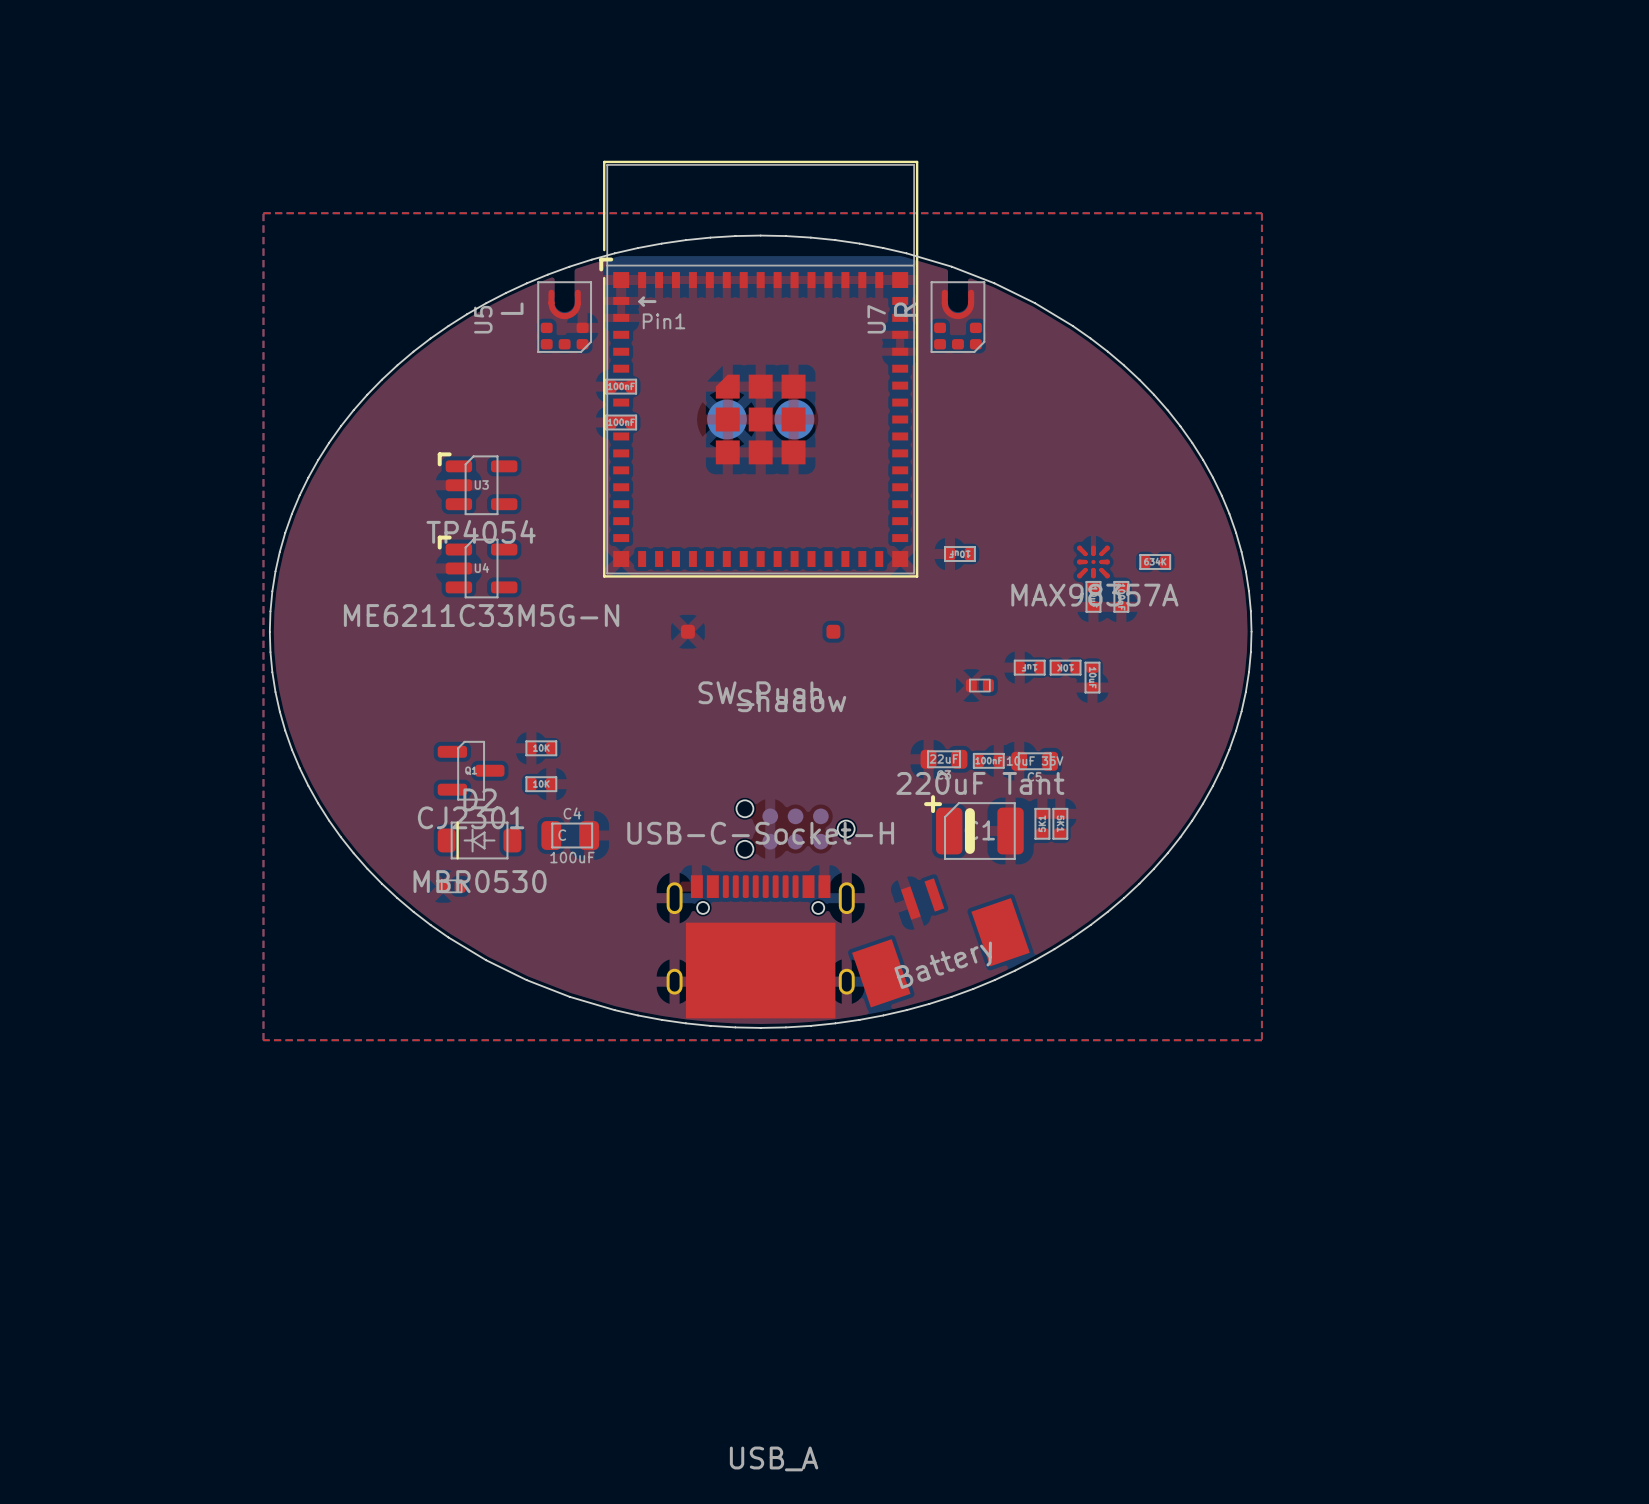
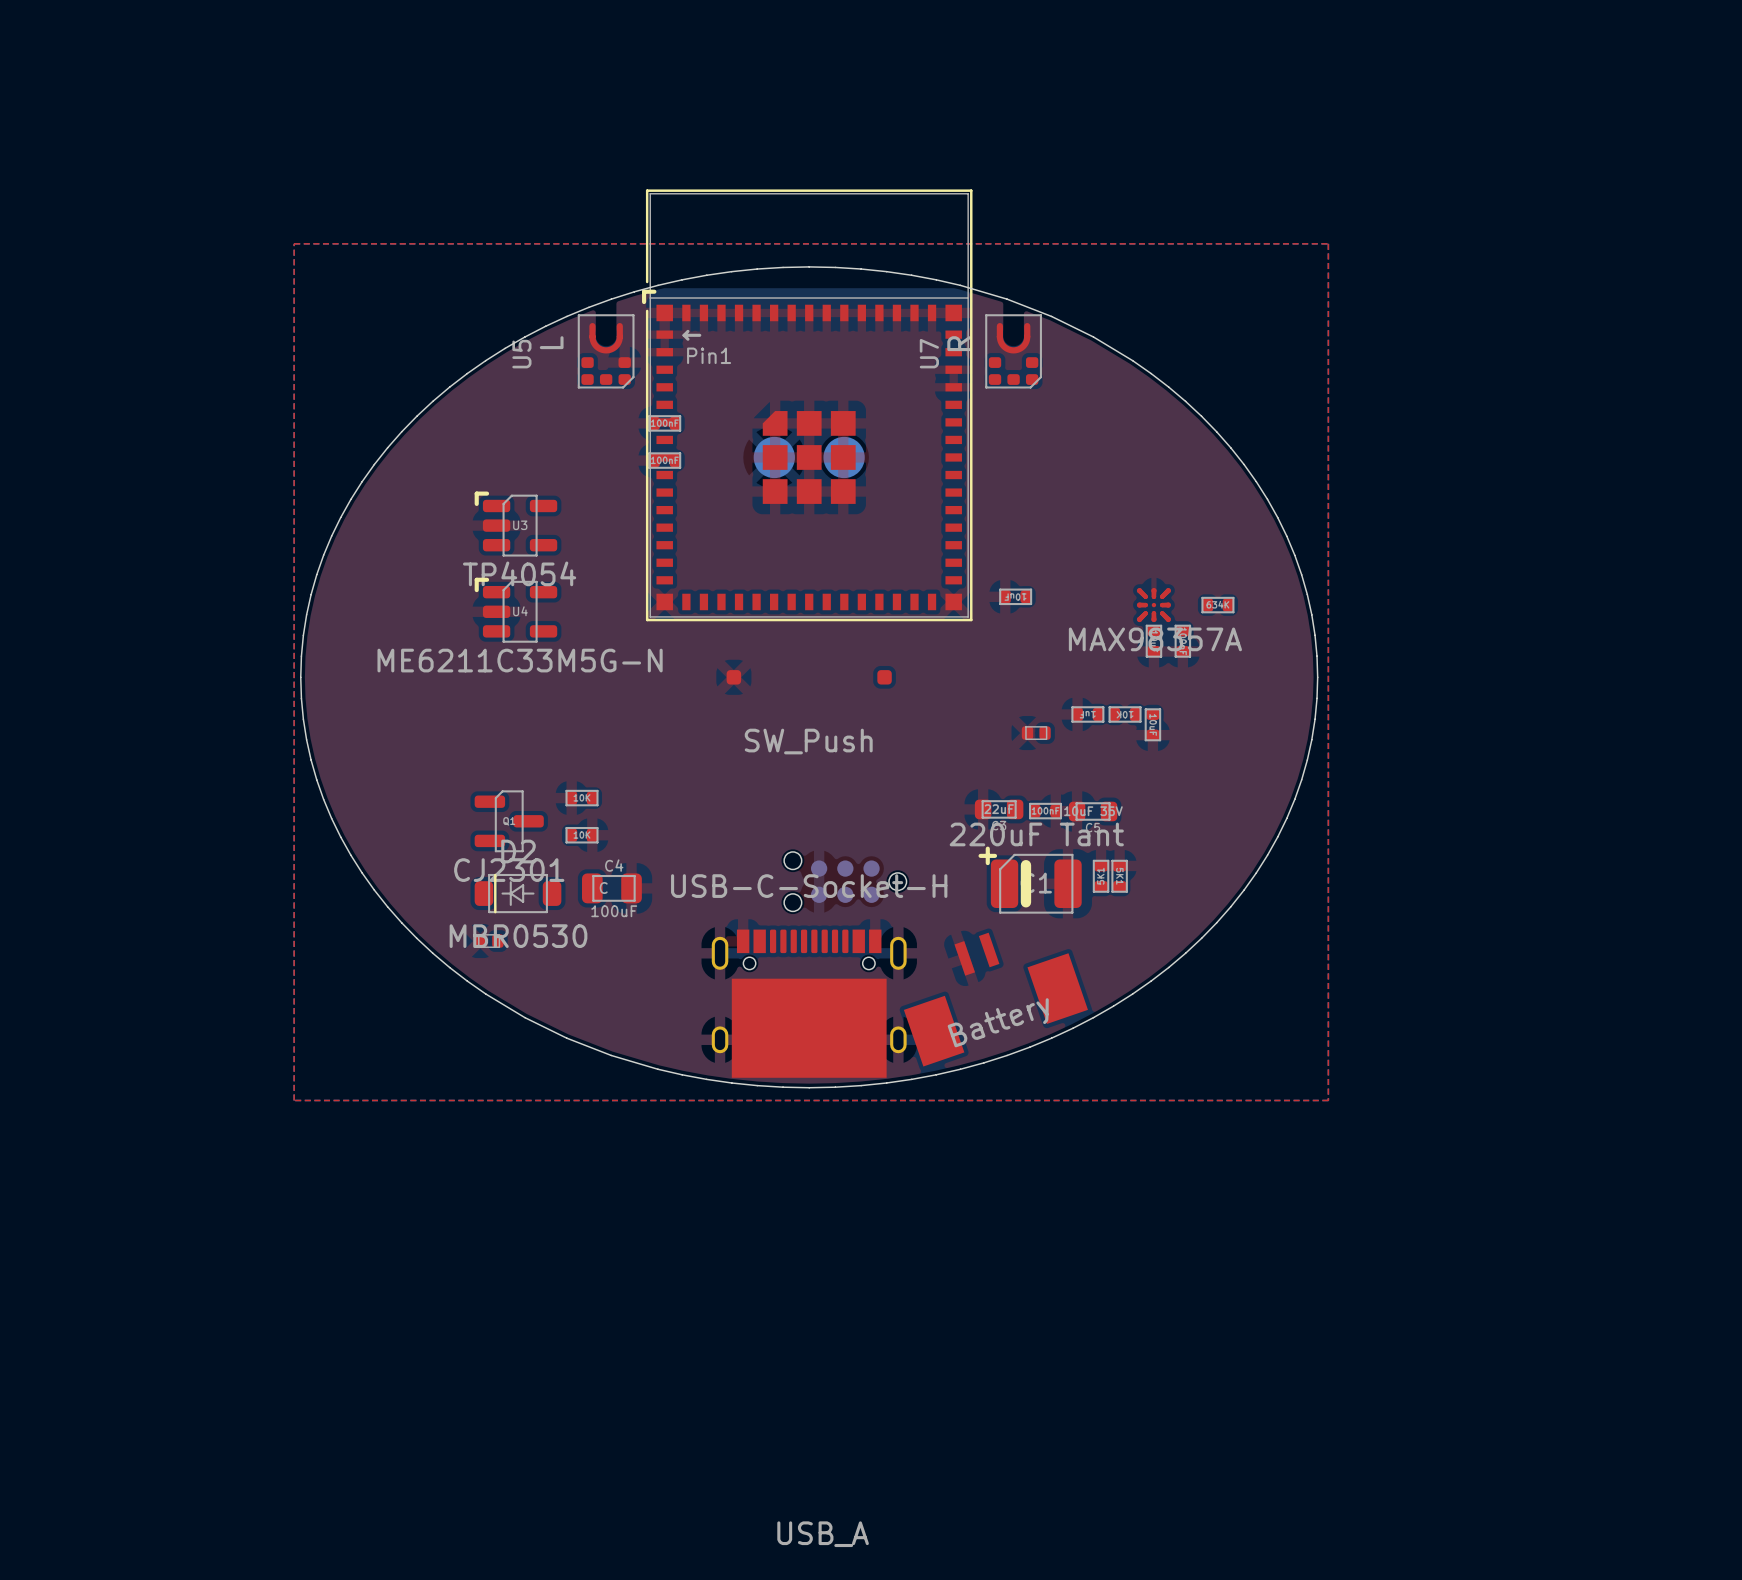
drawing: [737, 689, 847, 713] -> none

